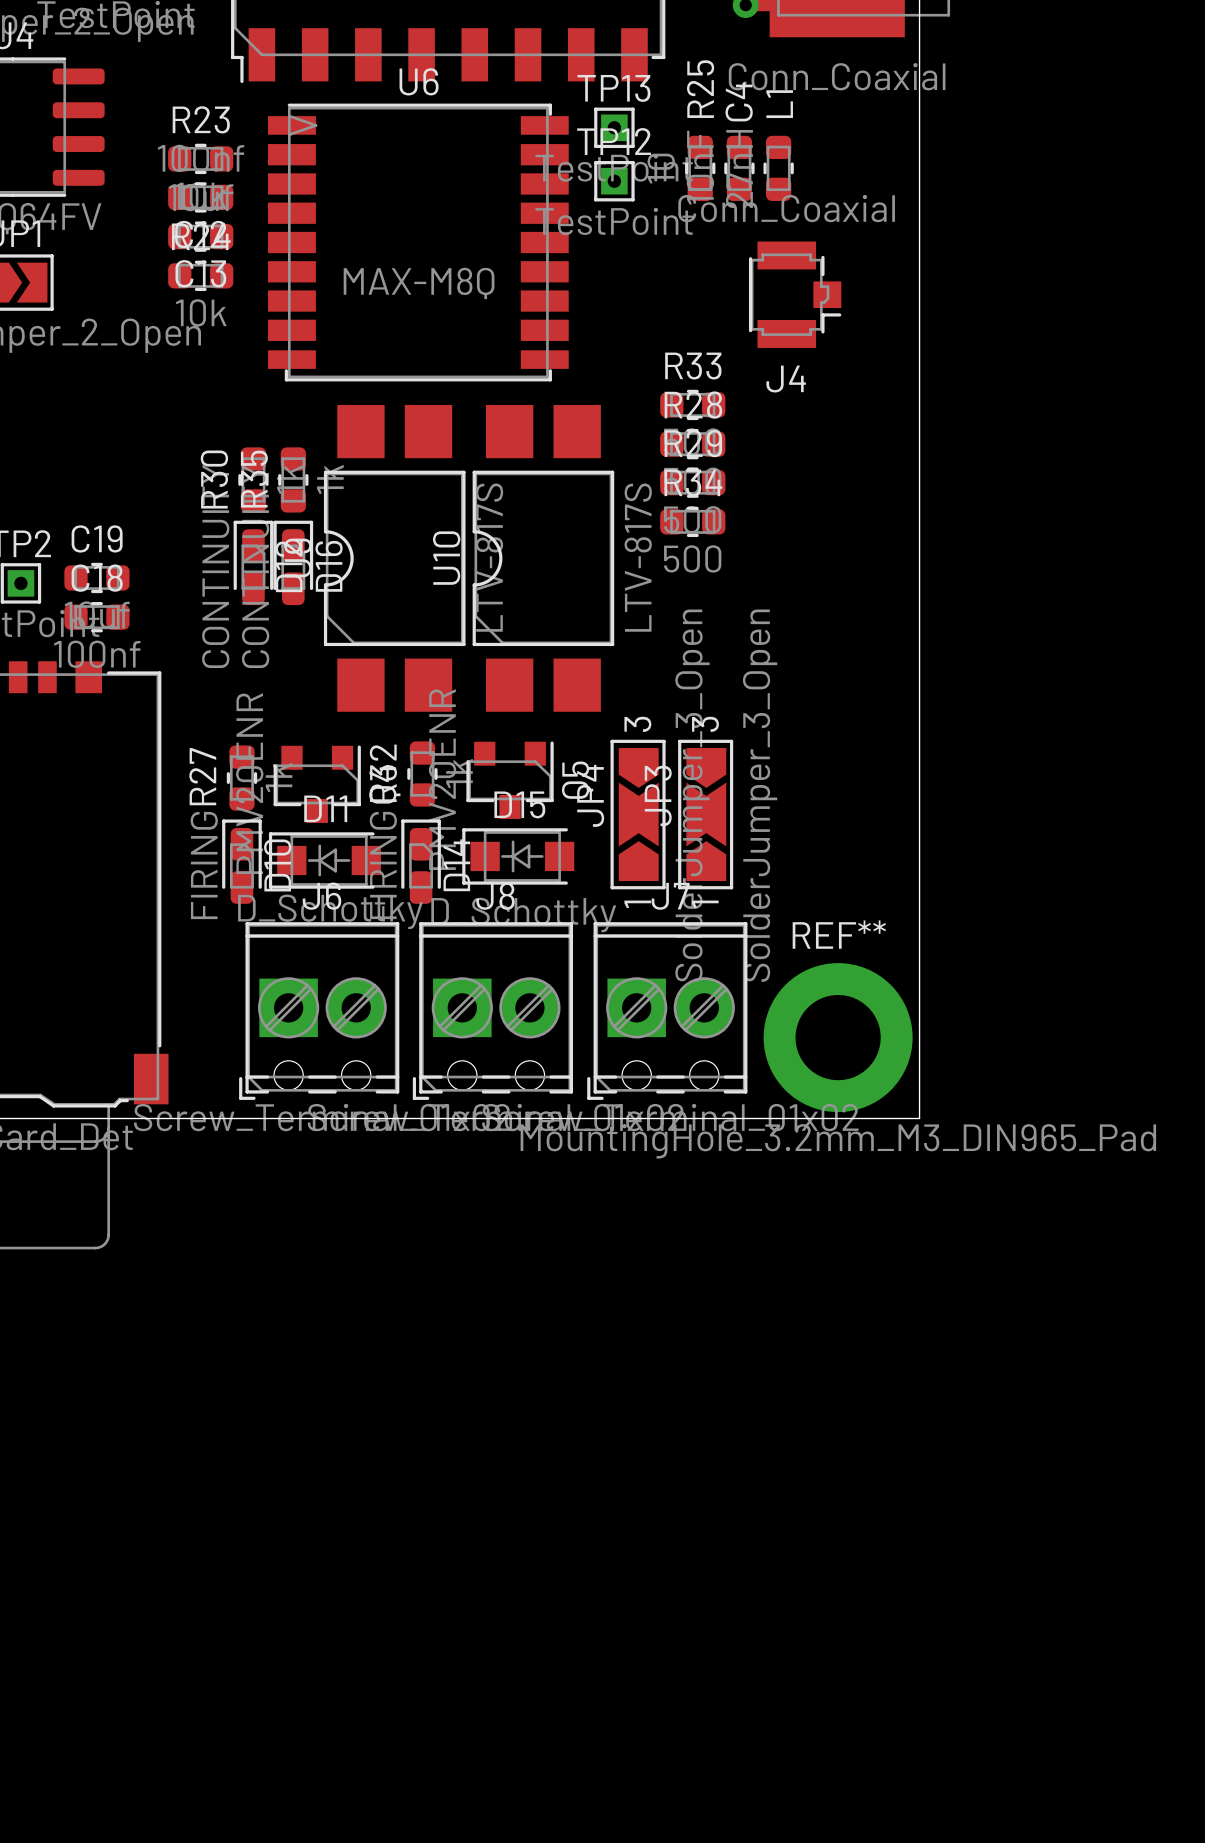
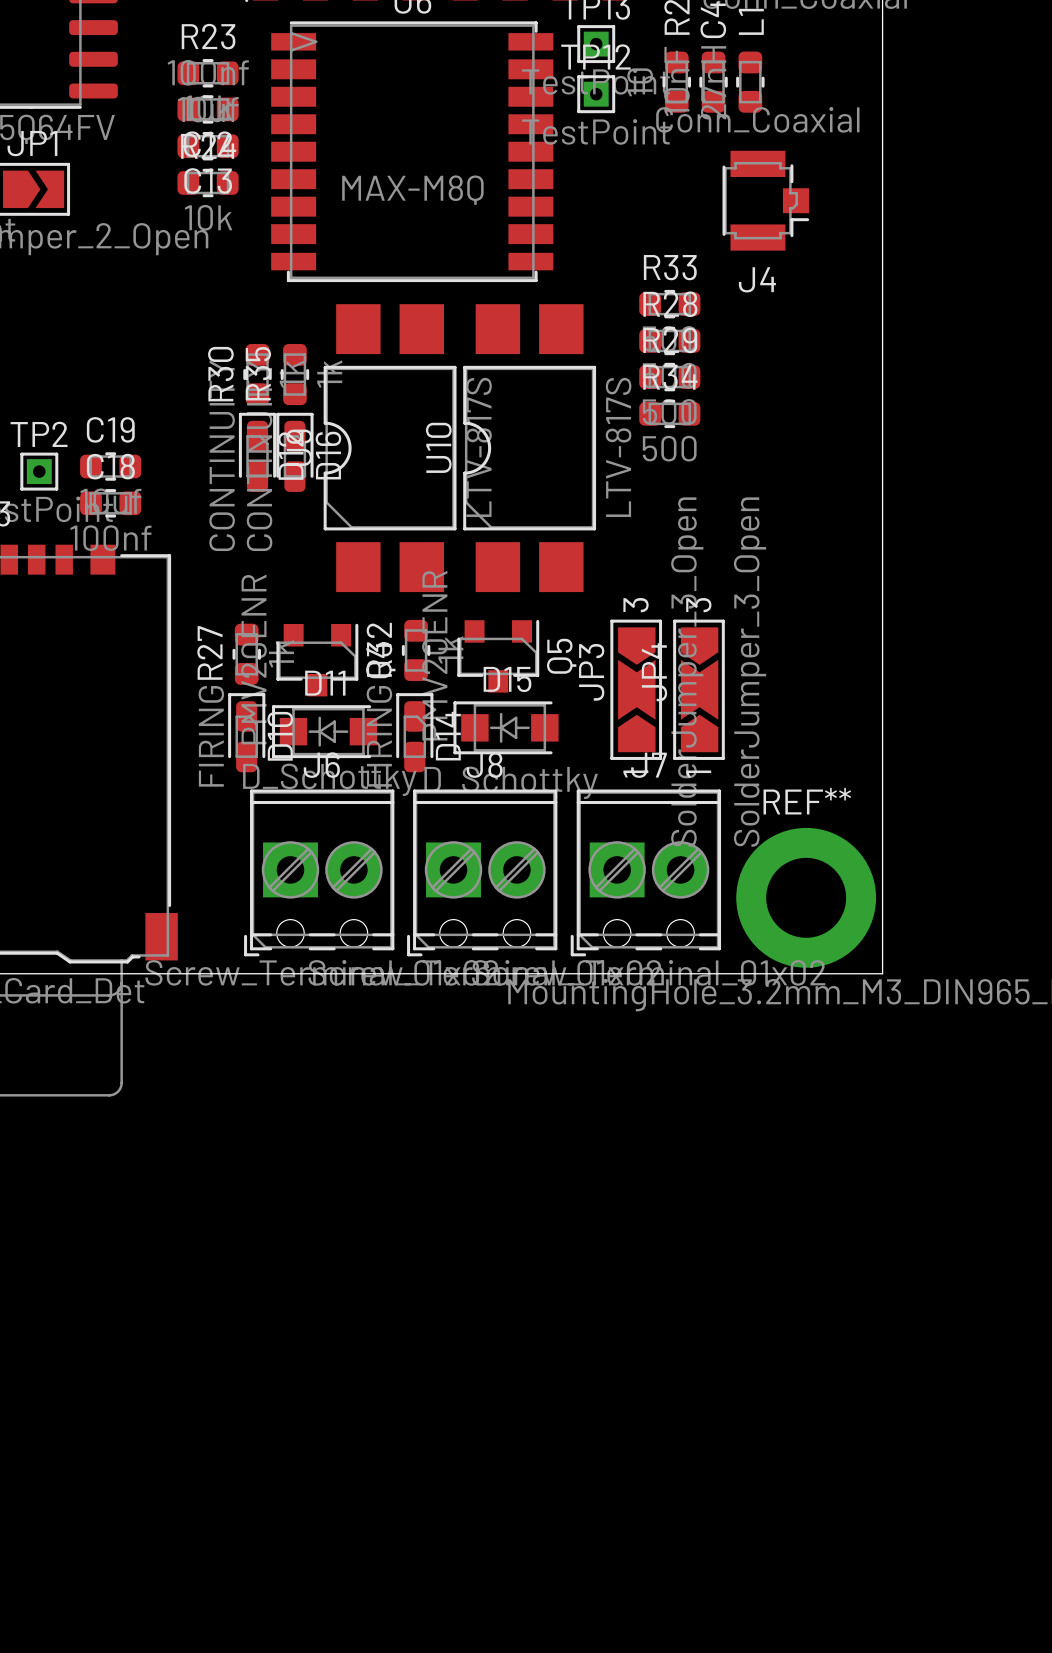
JP4 position: (638, 814) -> (698, 689)
JP3 position: (705, 814) -> (636, 689)

